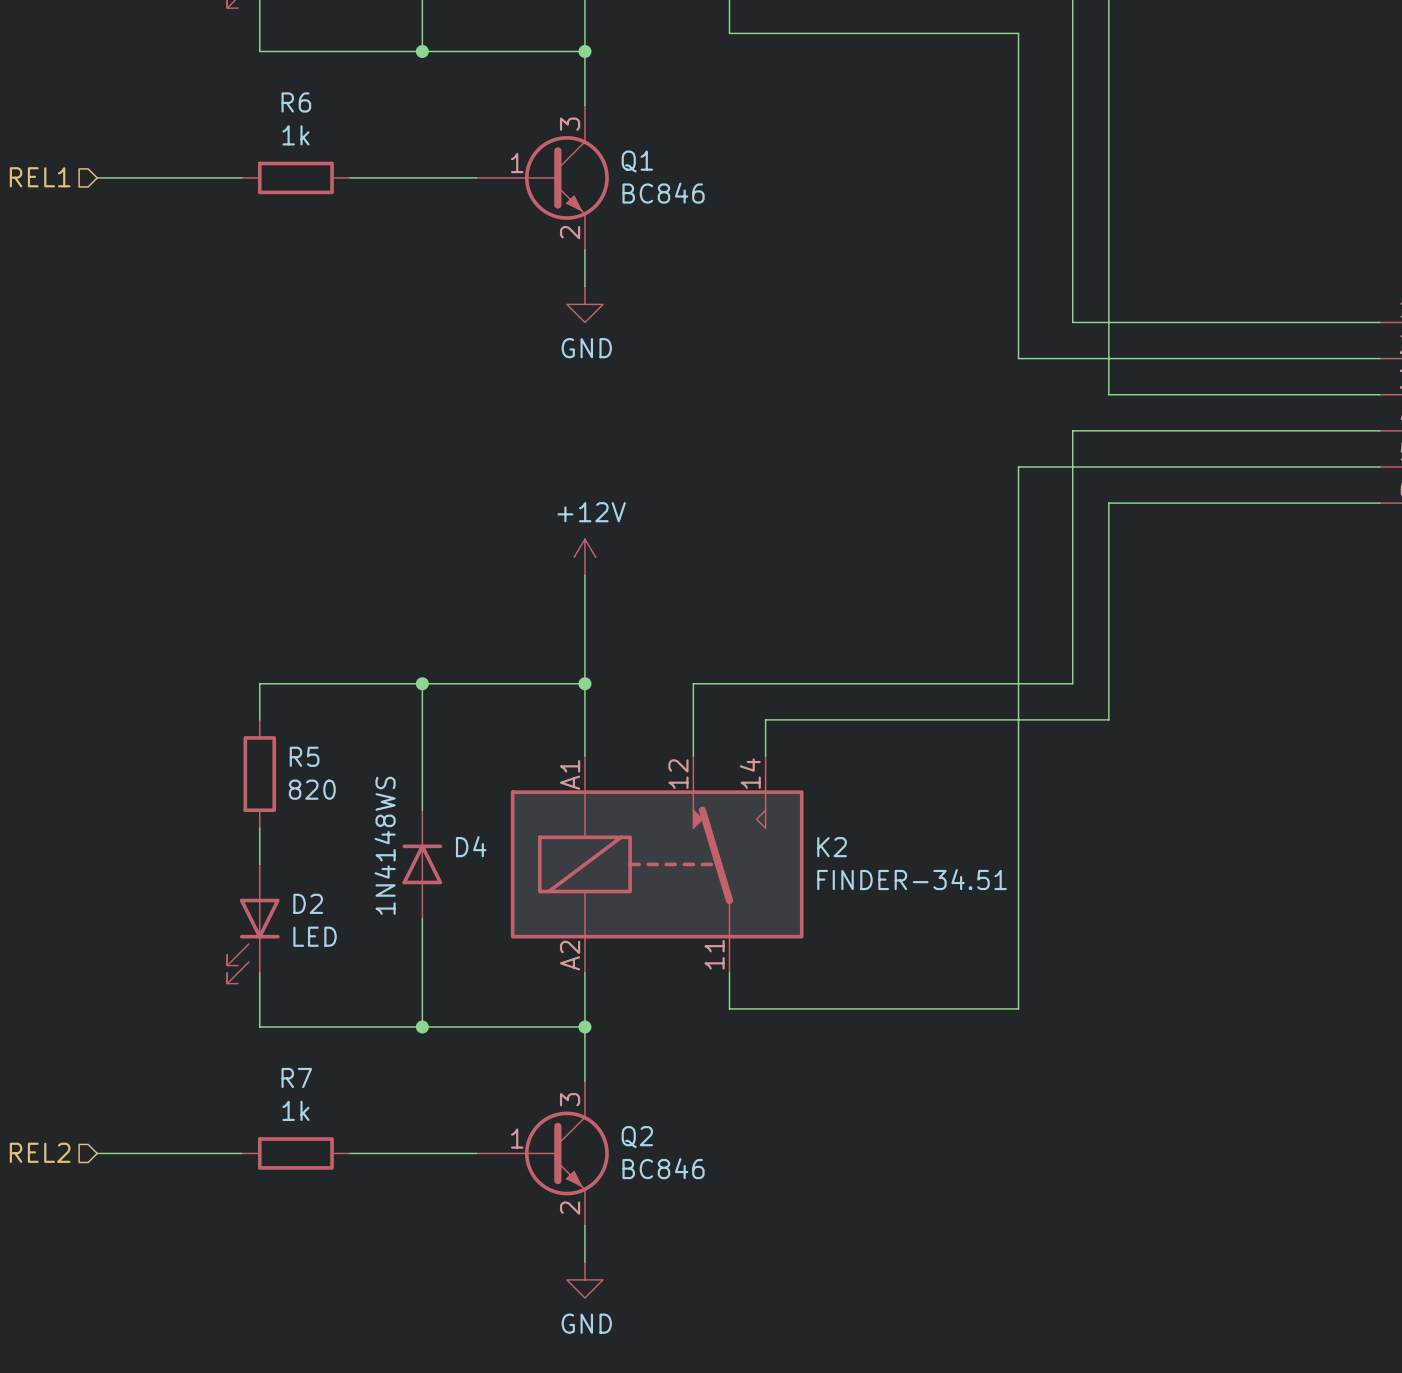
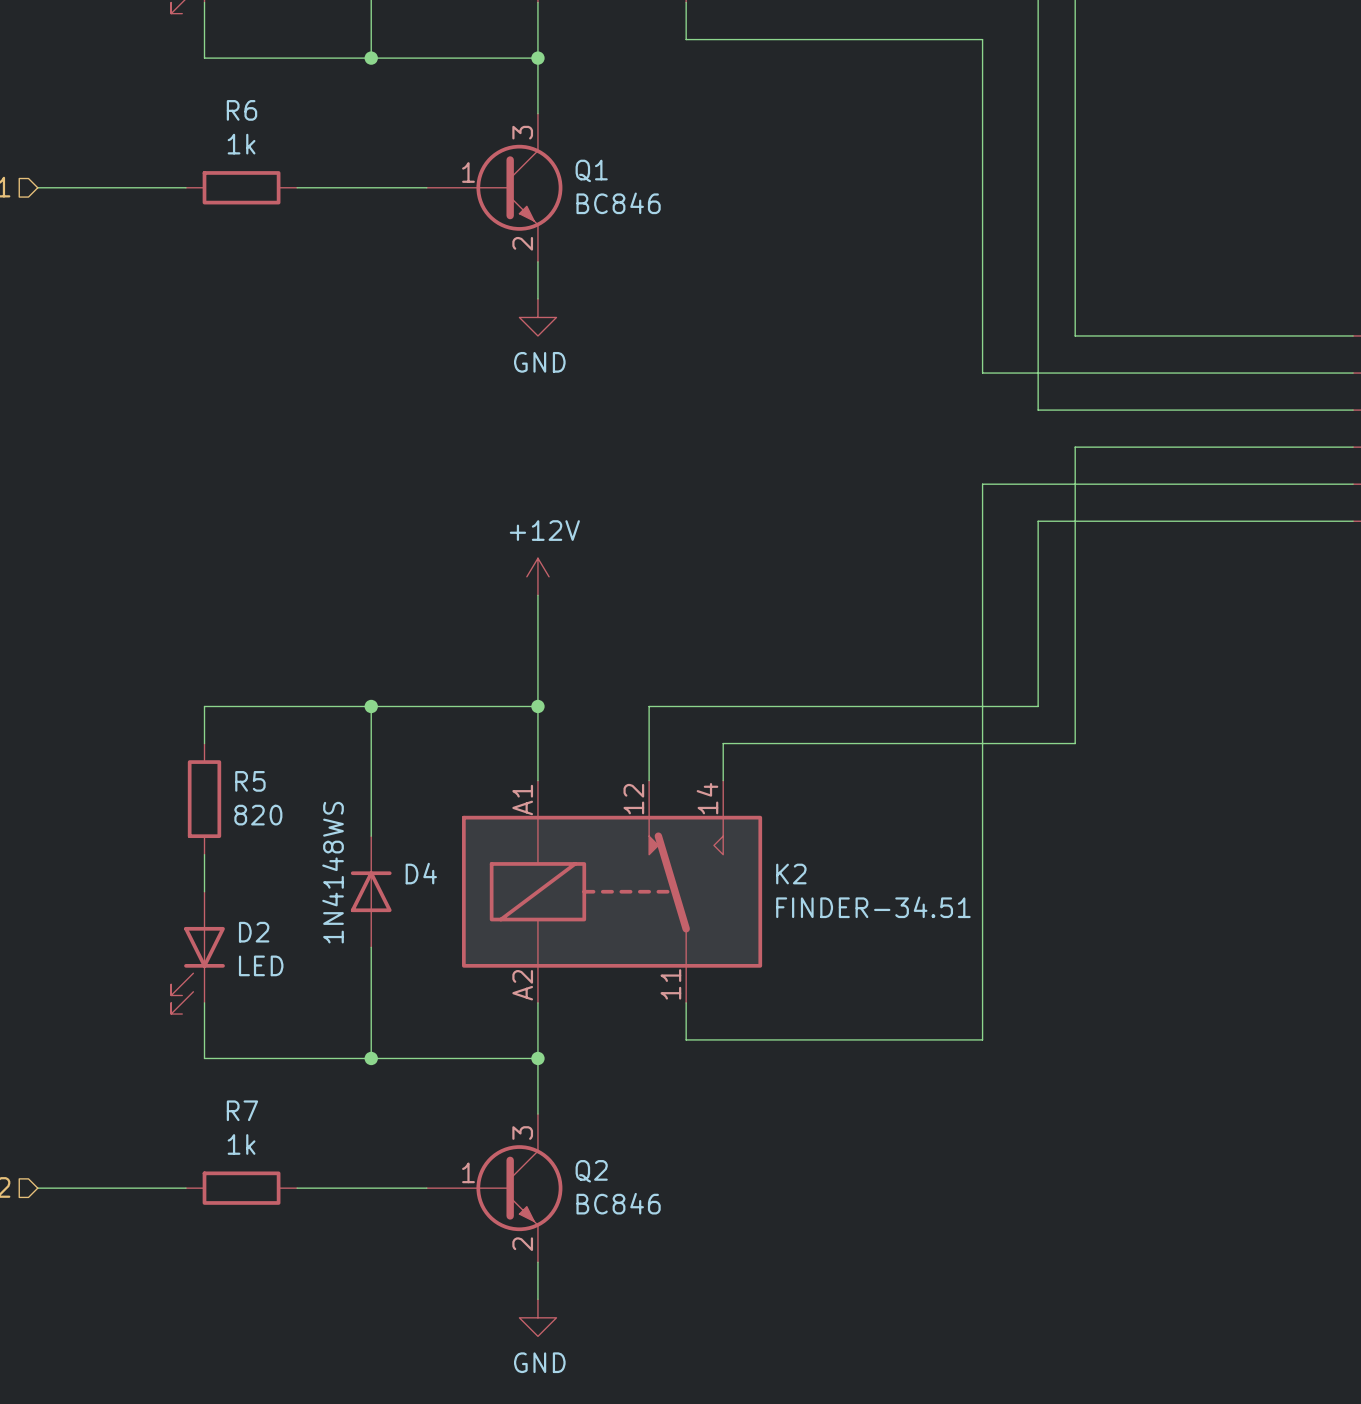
wire: (1072, 322) (1108, 322) (1108, 394) -> (1038, 335) (1038, 410) (1075, 410)
wire: (1108, 430) (1072, 430) (1072, 503) -> (1075, 447) (1075, 521) (1038, 521)

